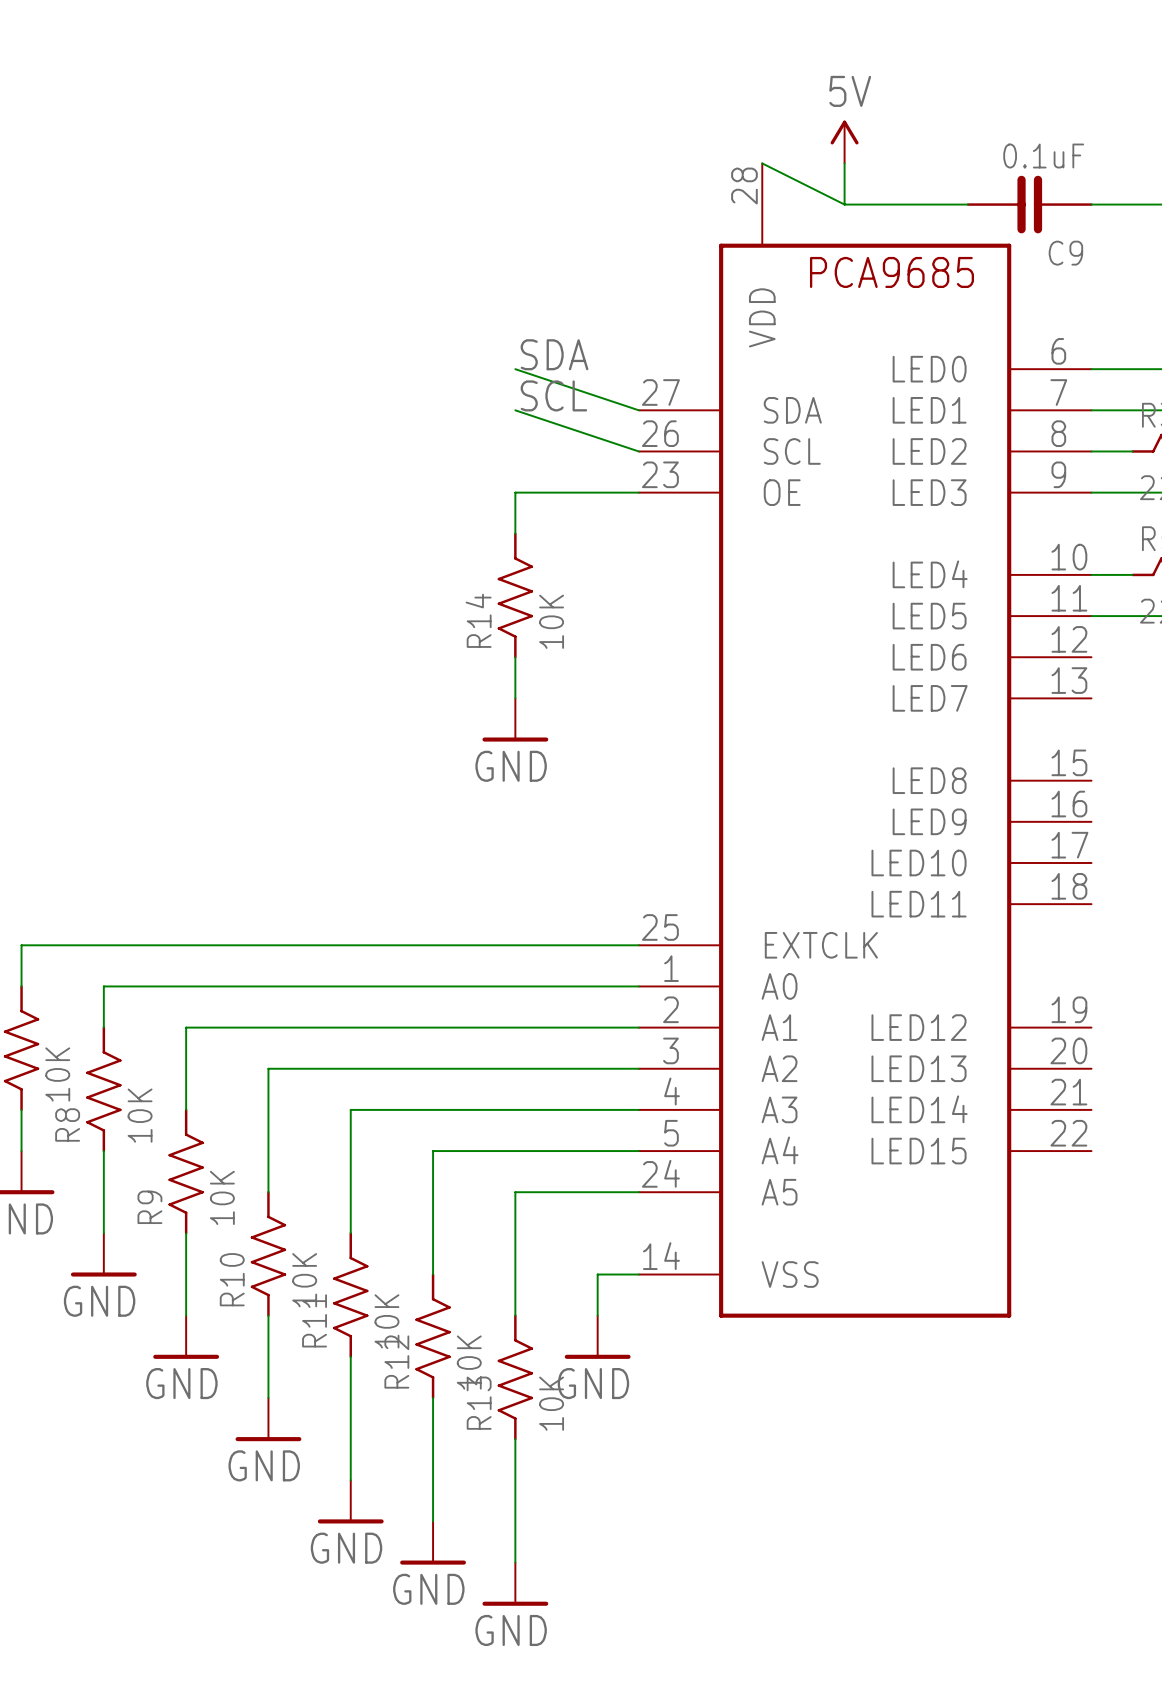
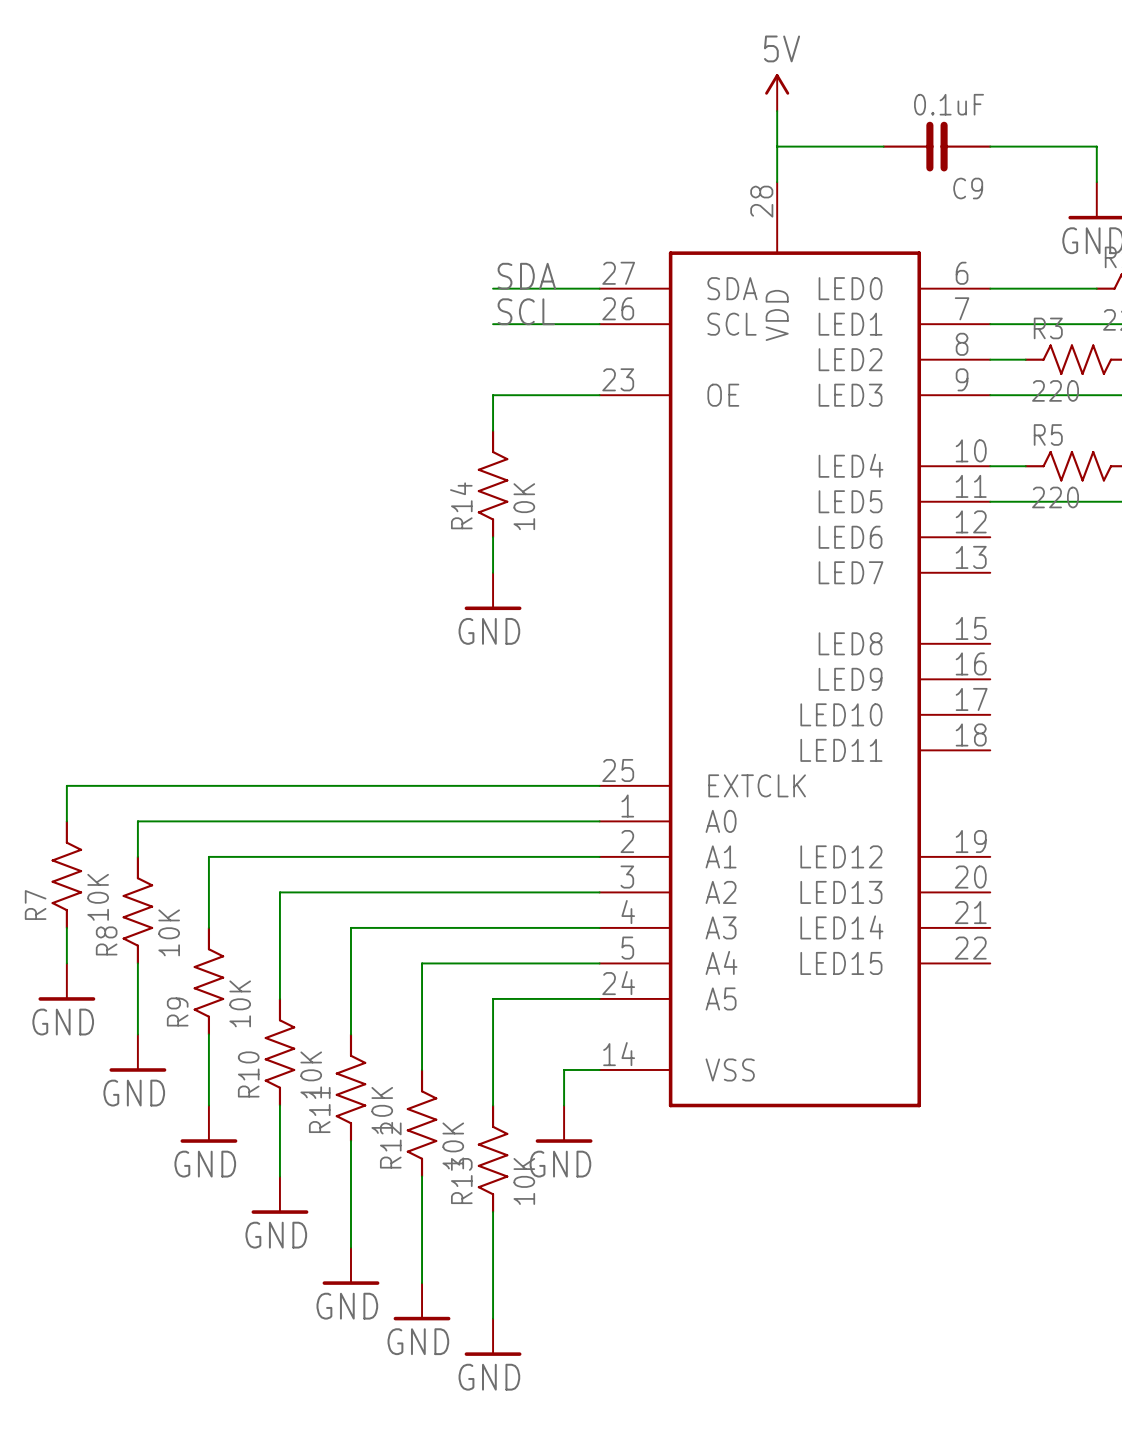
wire: (762, 163) (844, 204) -> (777, 182) (777, 146)
wire: (515, 369) (638, 410) -> (493, 288) (599, 288)
wire: (515, 410) (638, 451) -> (493, 324) (599, 324)
part: (865, 740) -> none
part: none -> (794, 644)

